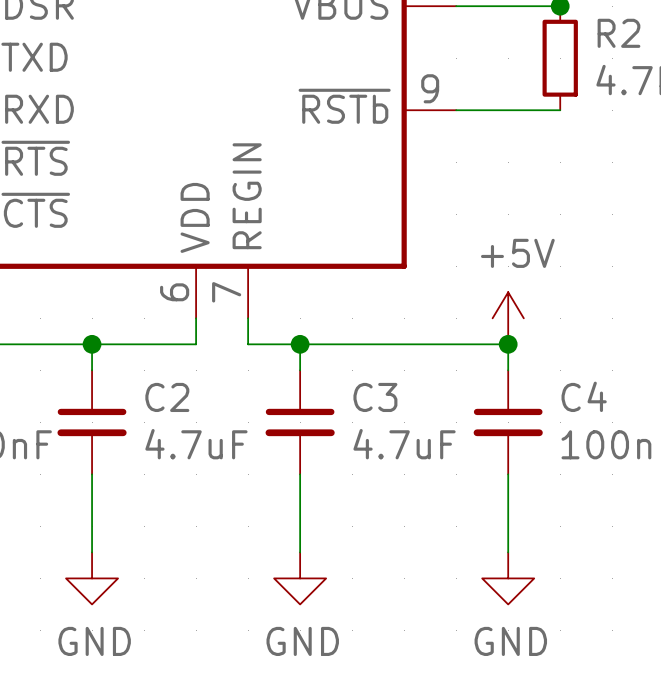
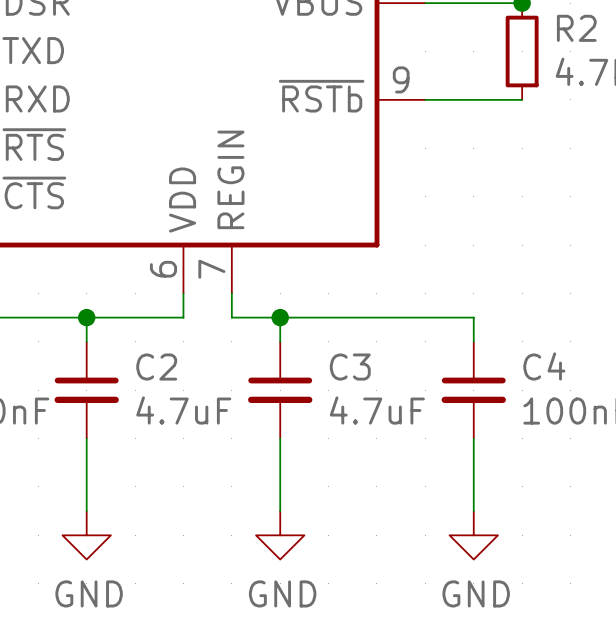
power symbol: +5V (508, 318) -> none
junction: (508, 344) -> none

